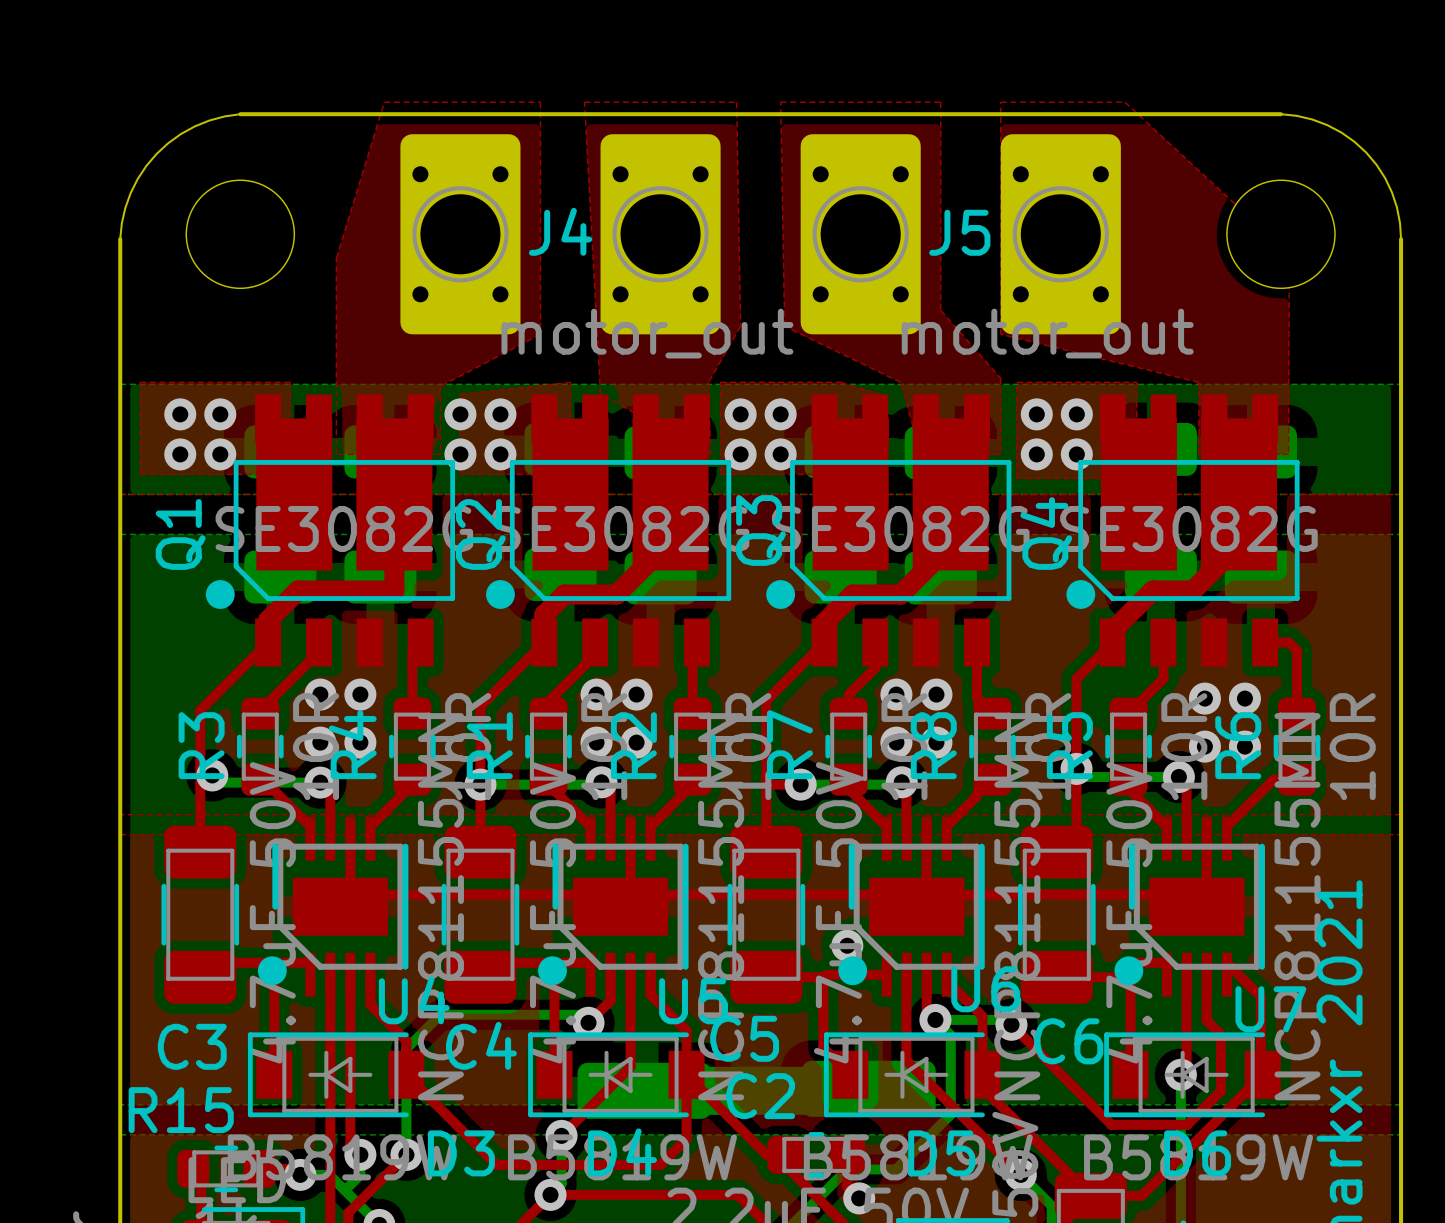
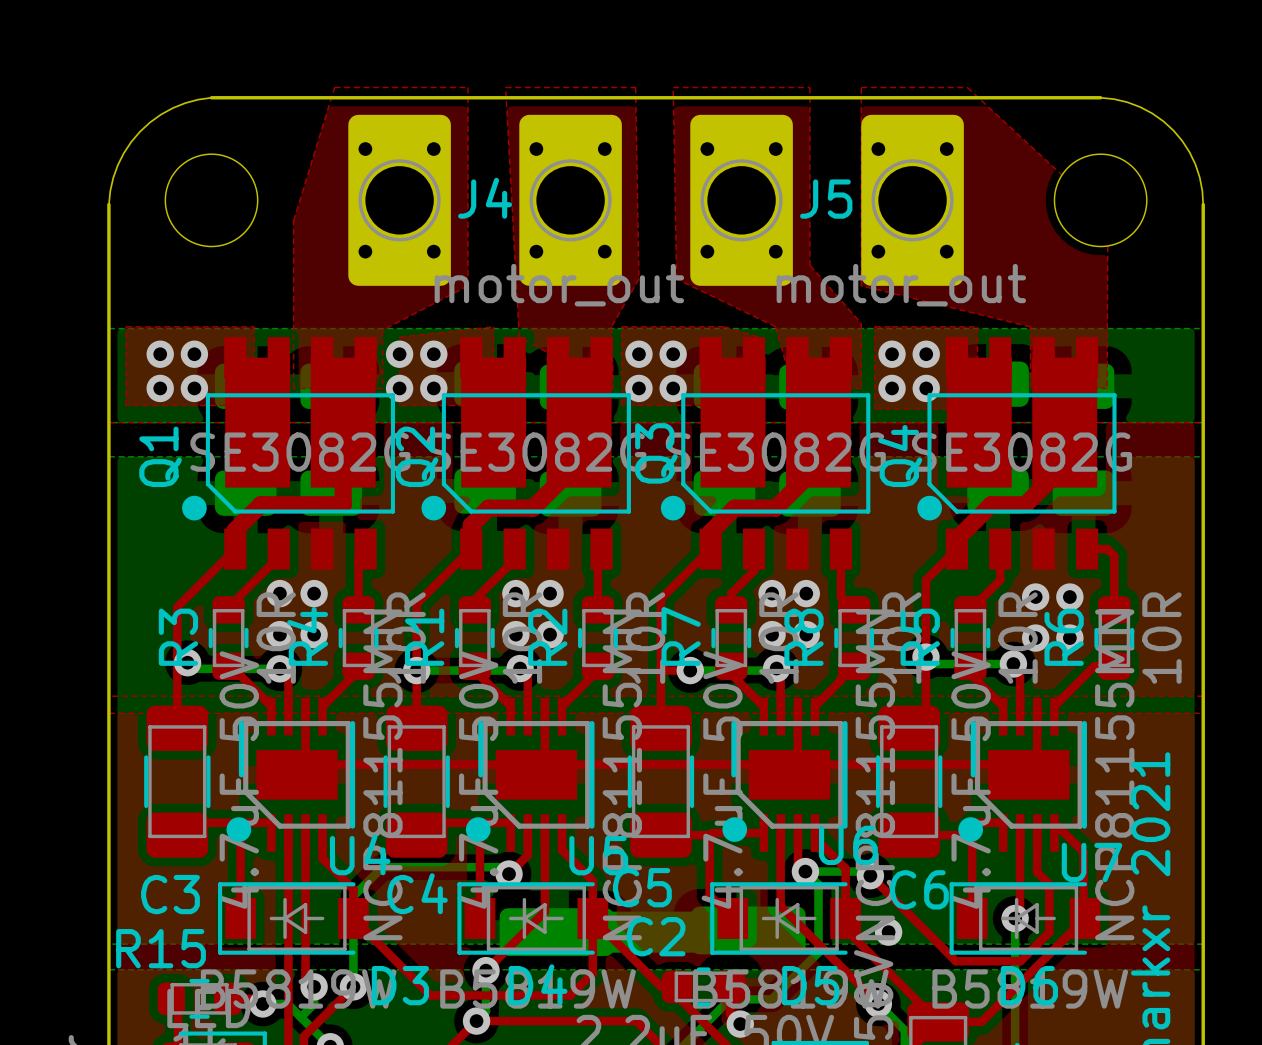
via position: (847, 945) -> (888, 932)

